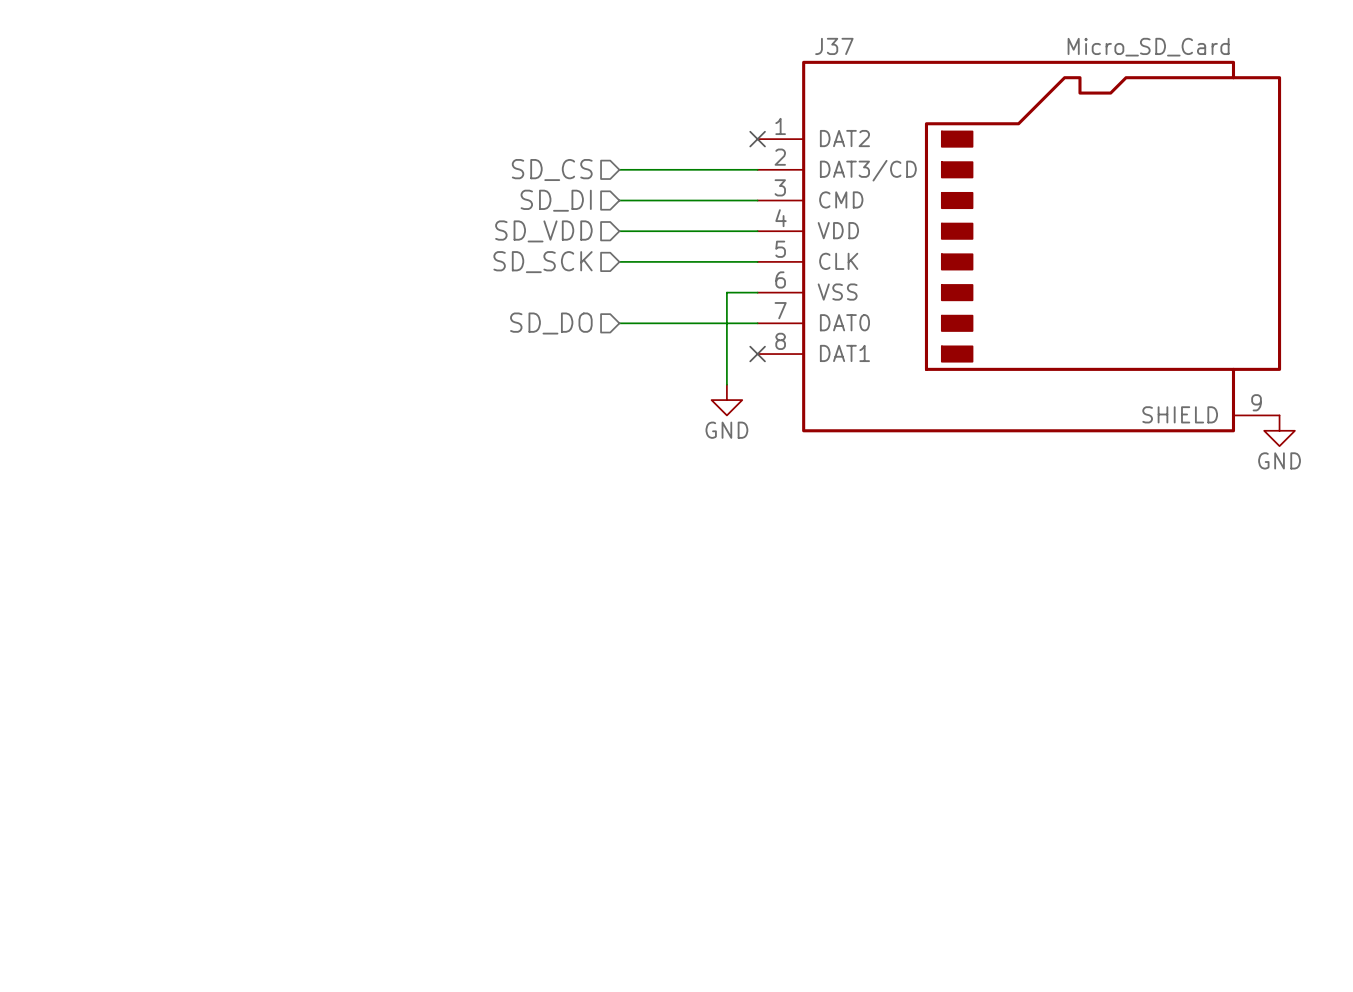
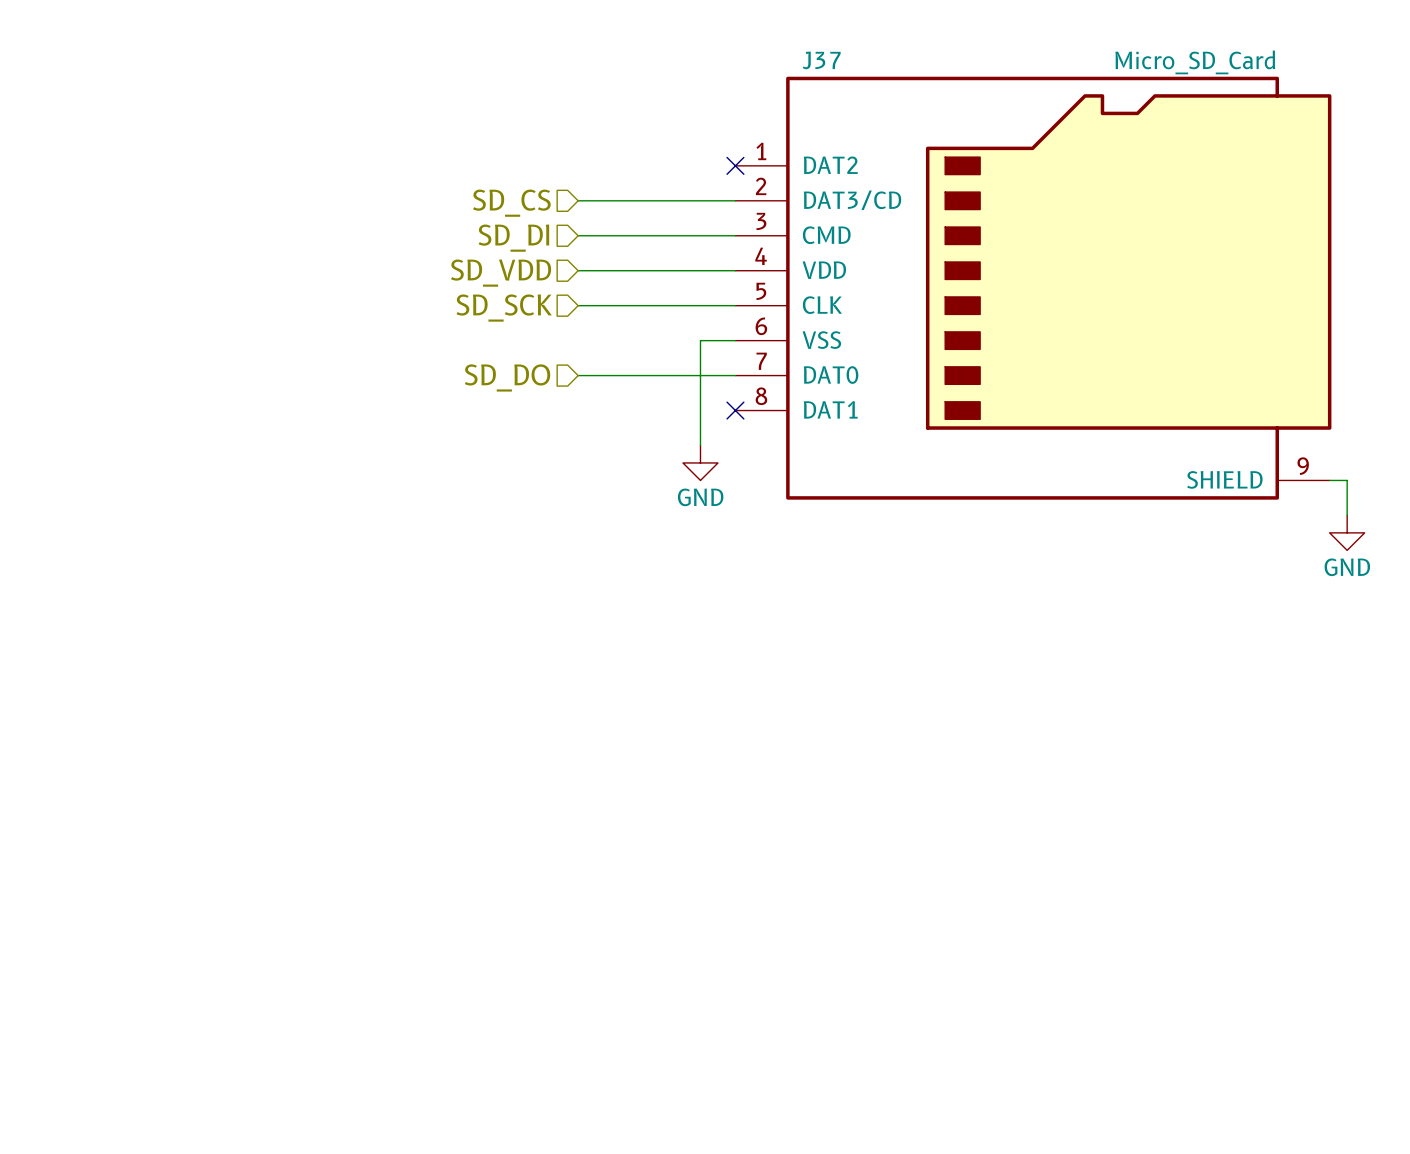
wire: none -> (1329, 480) (1347, 480) (1347, 515)
power symbol position: GND (1279, 430) -> GND (1347, 532)

